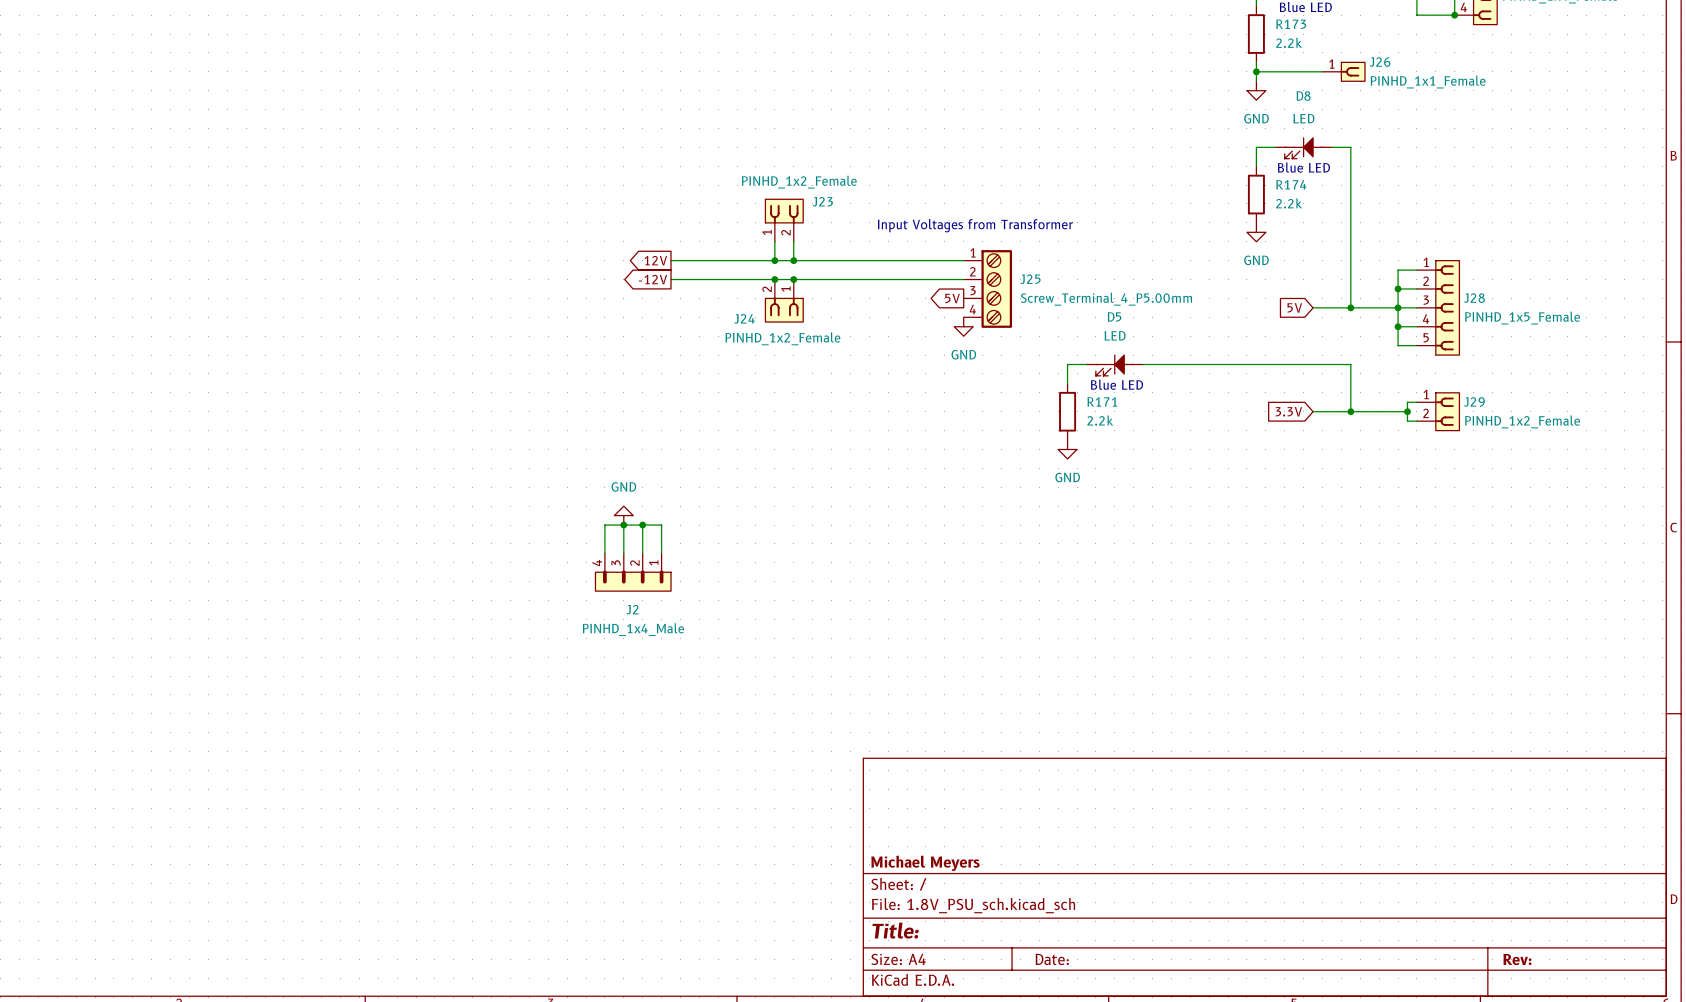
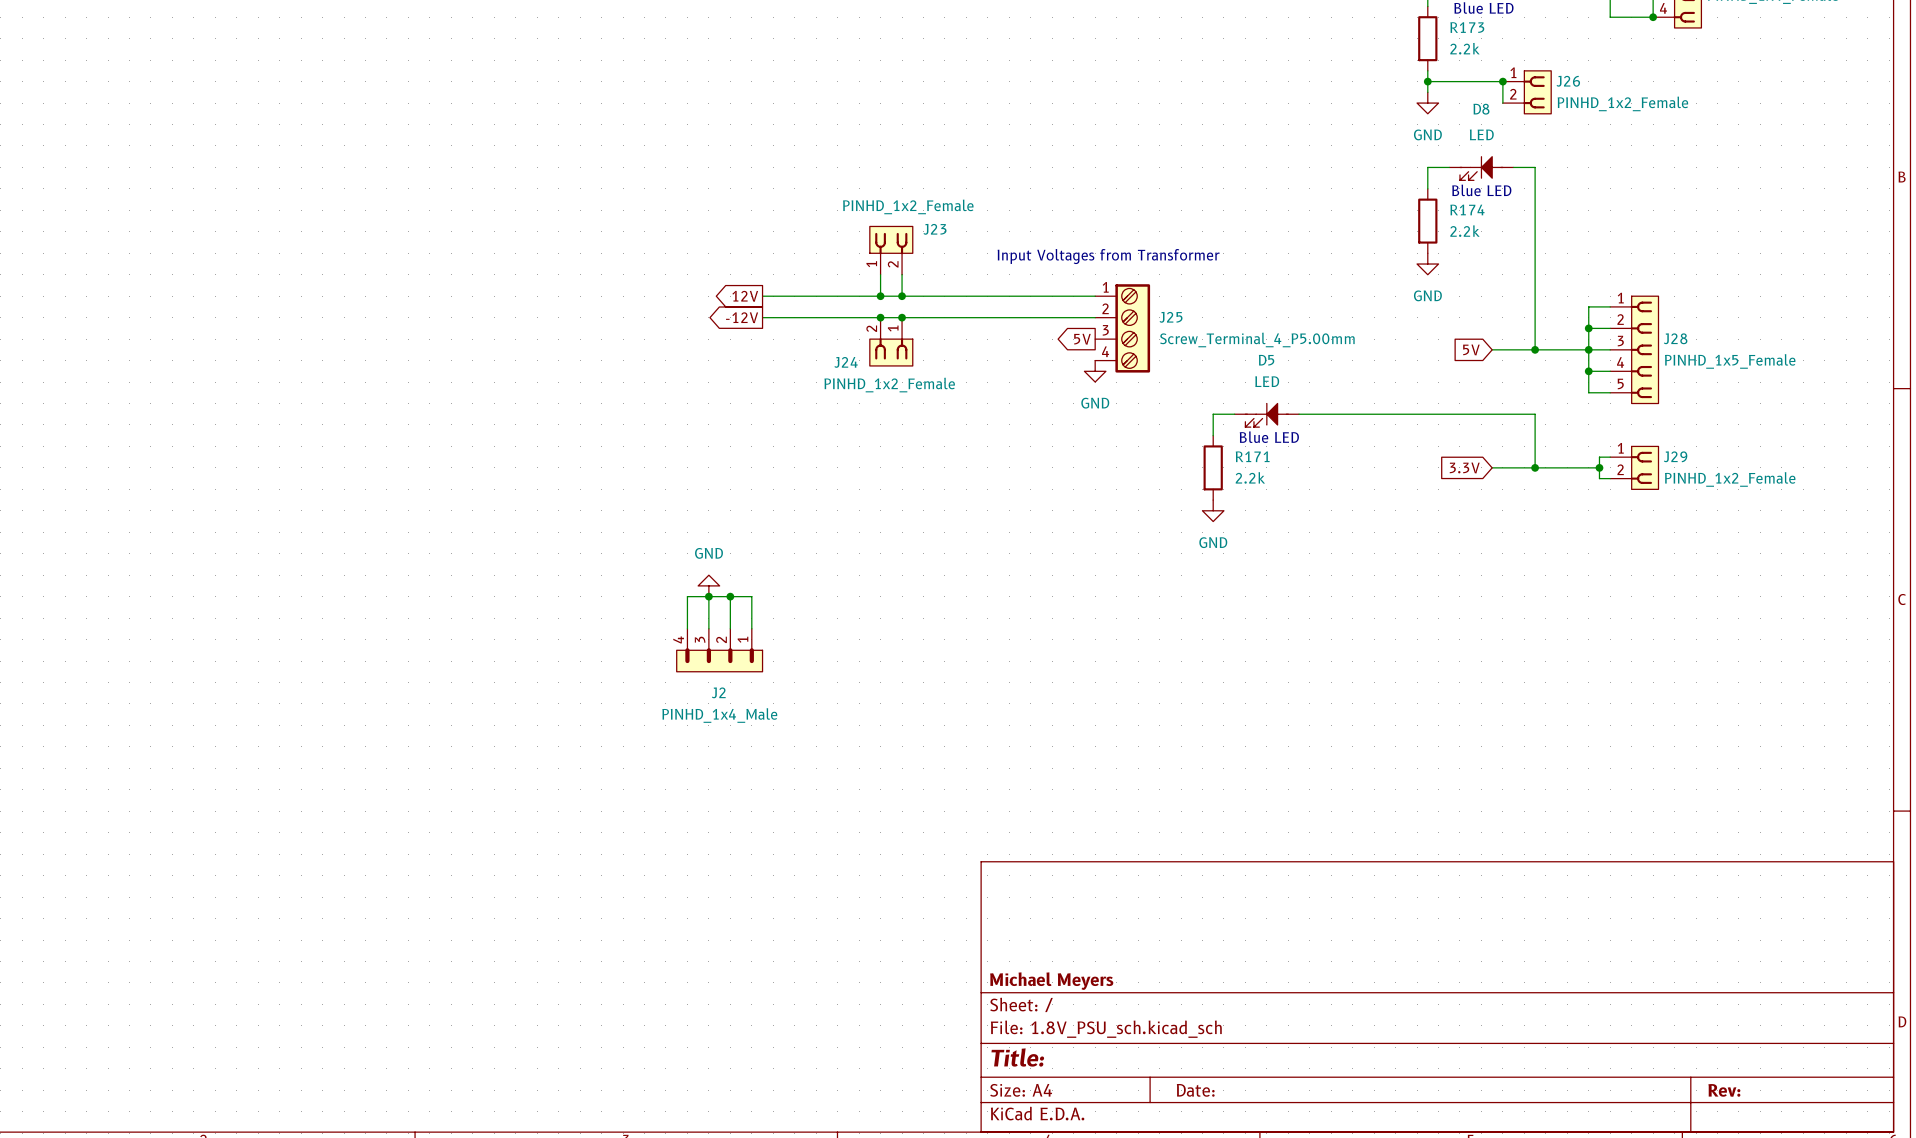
J26 symbol: [1322, 62, 1365, 82] -> [1502, 70, 1552, 114]
wire: none -> (1502, 81) (1502, 103)
junction: none -> (1502, 81)
J26 value: PINHD_1x1_Female (1428, 82) -> PINHD_1x2_Female (1622, 103)

